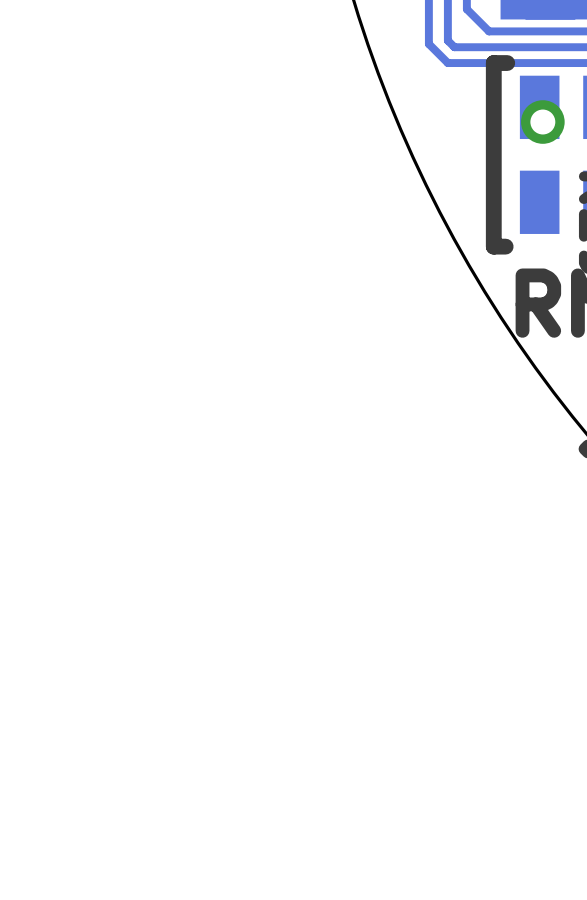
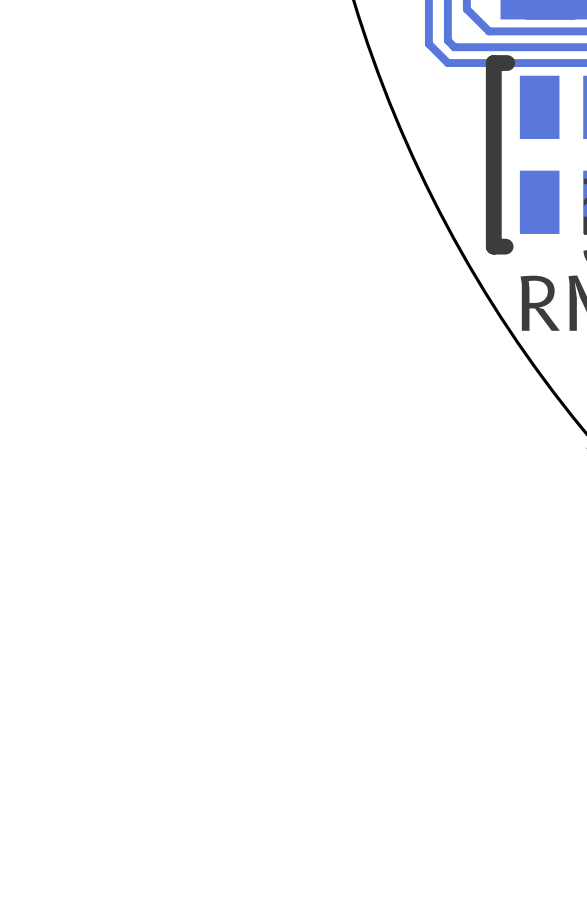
via: (542, 122) -> none

